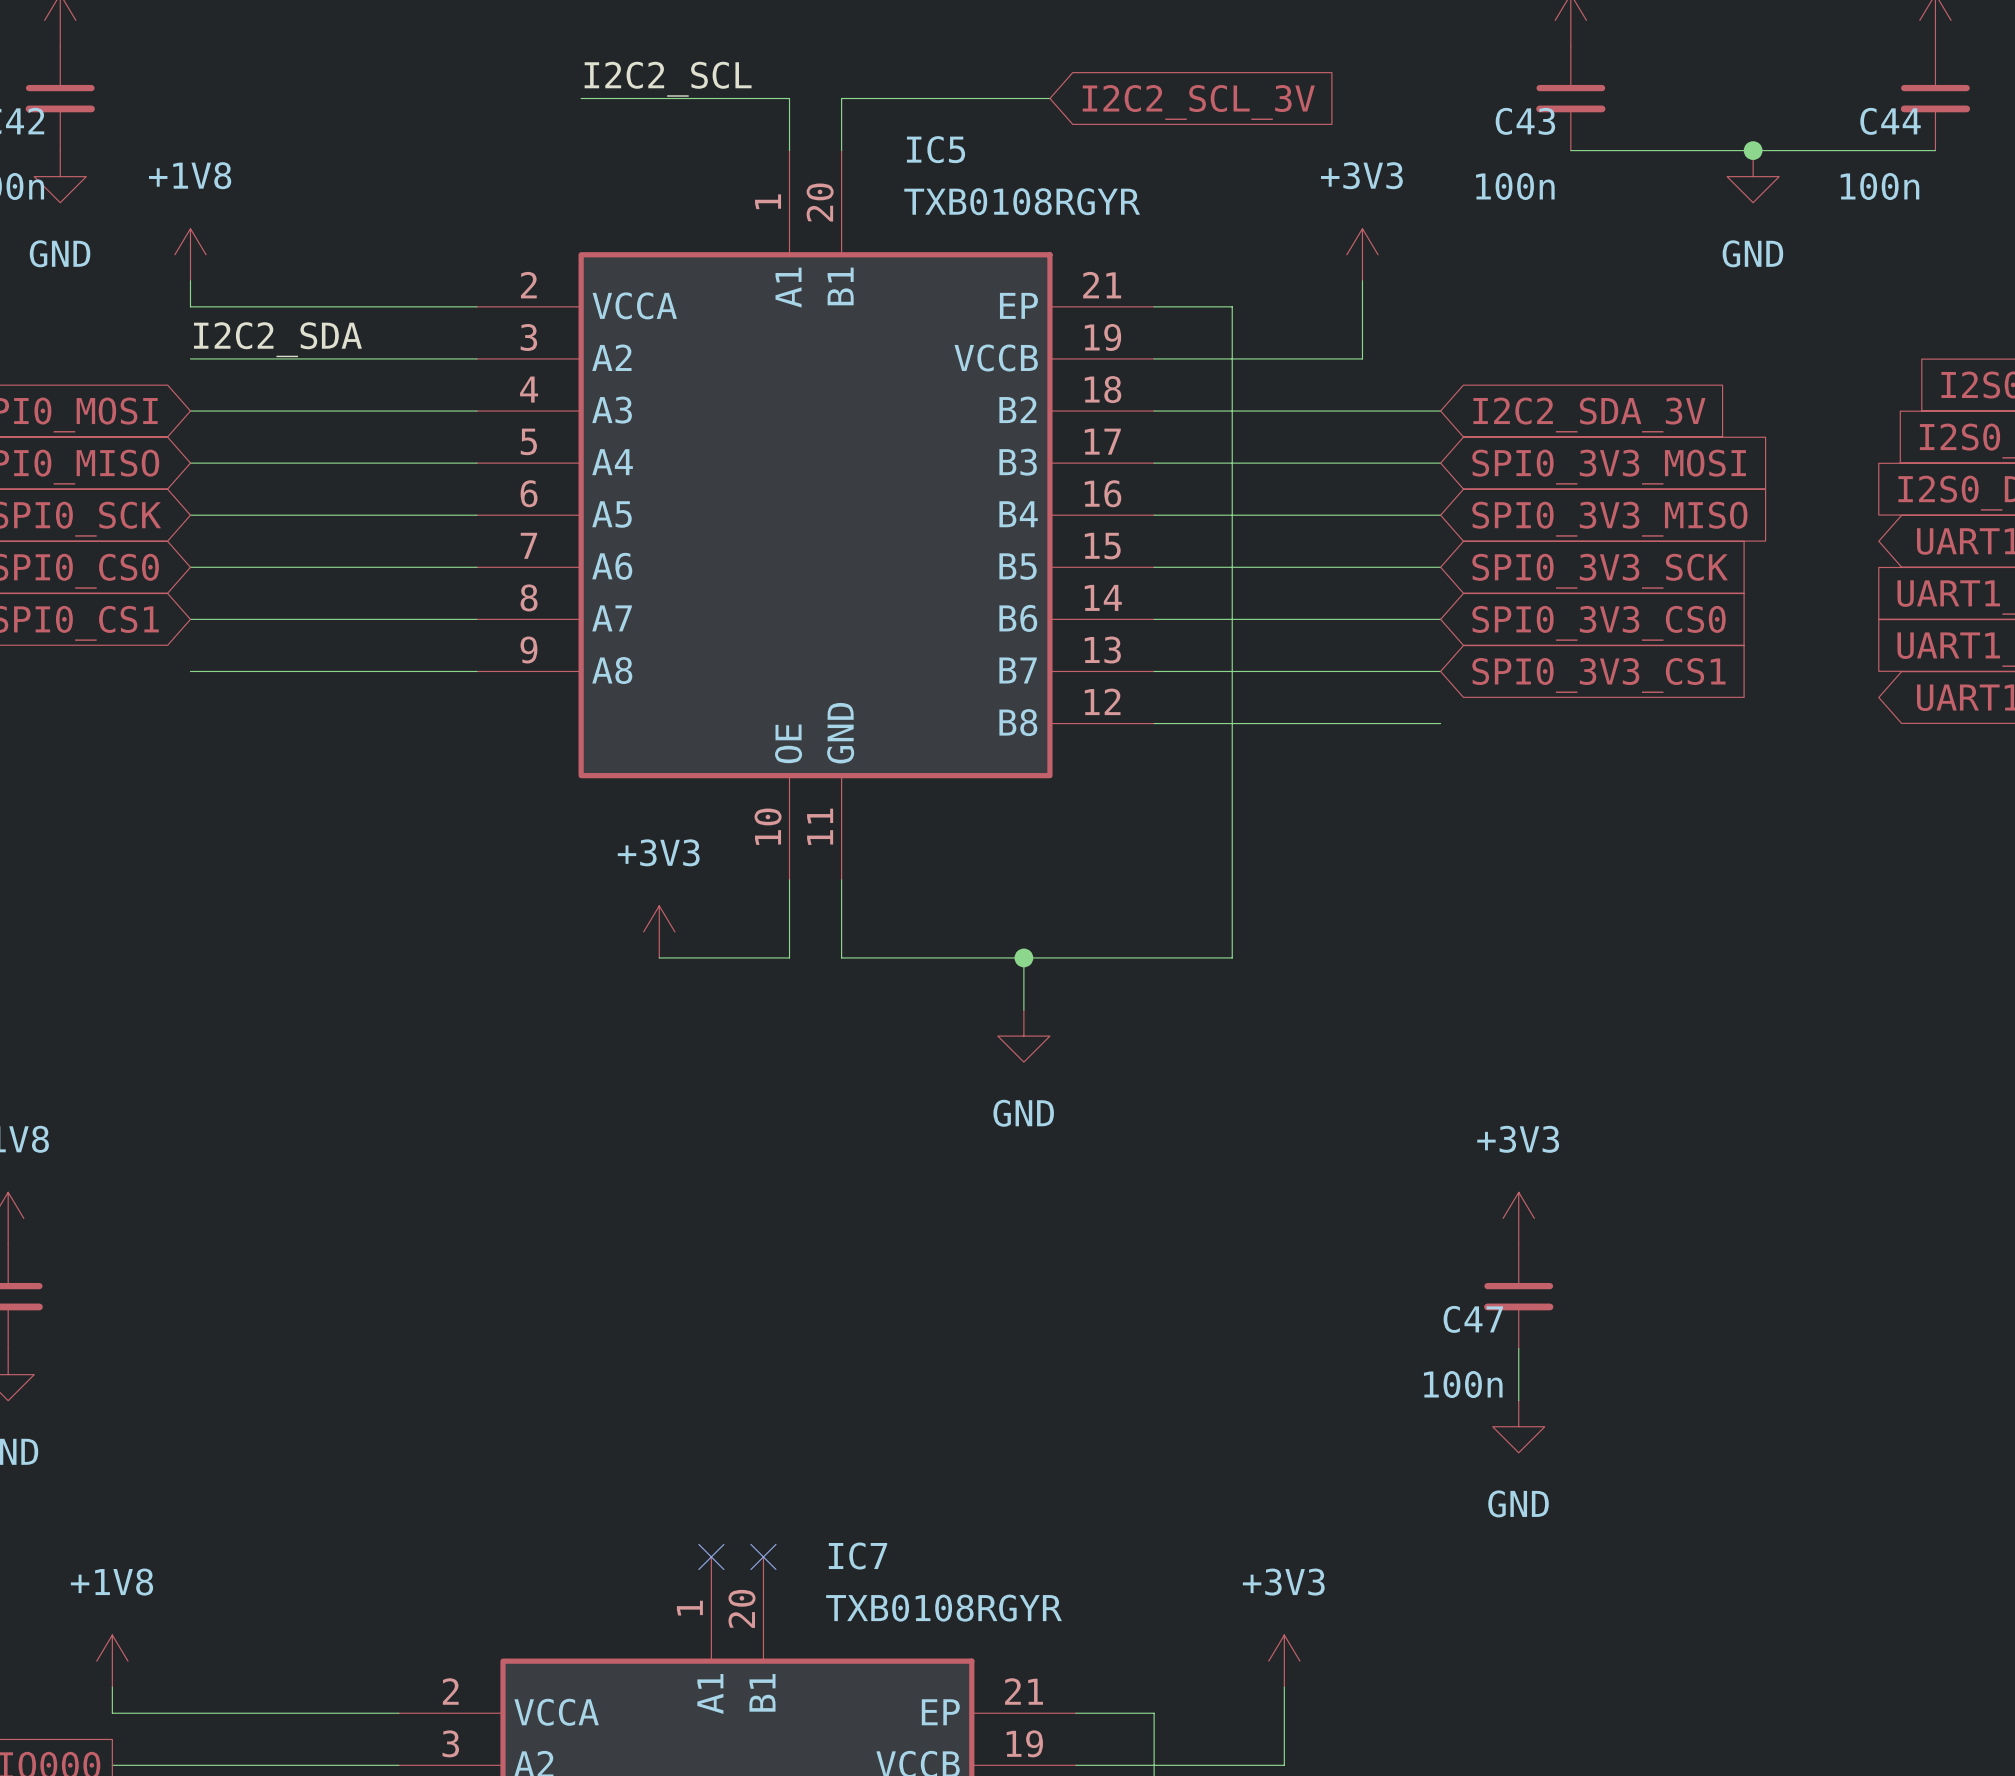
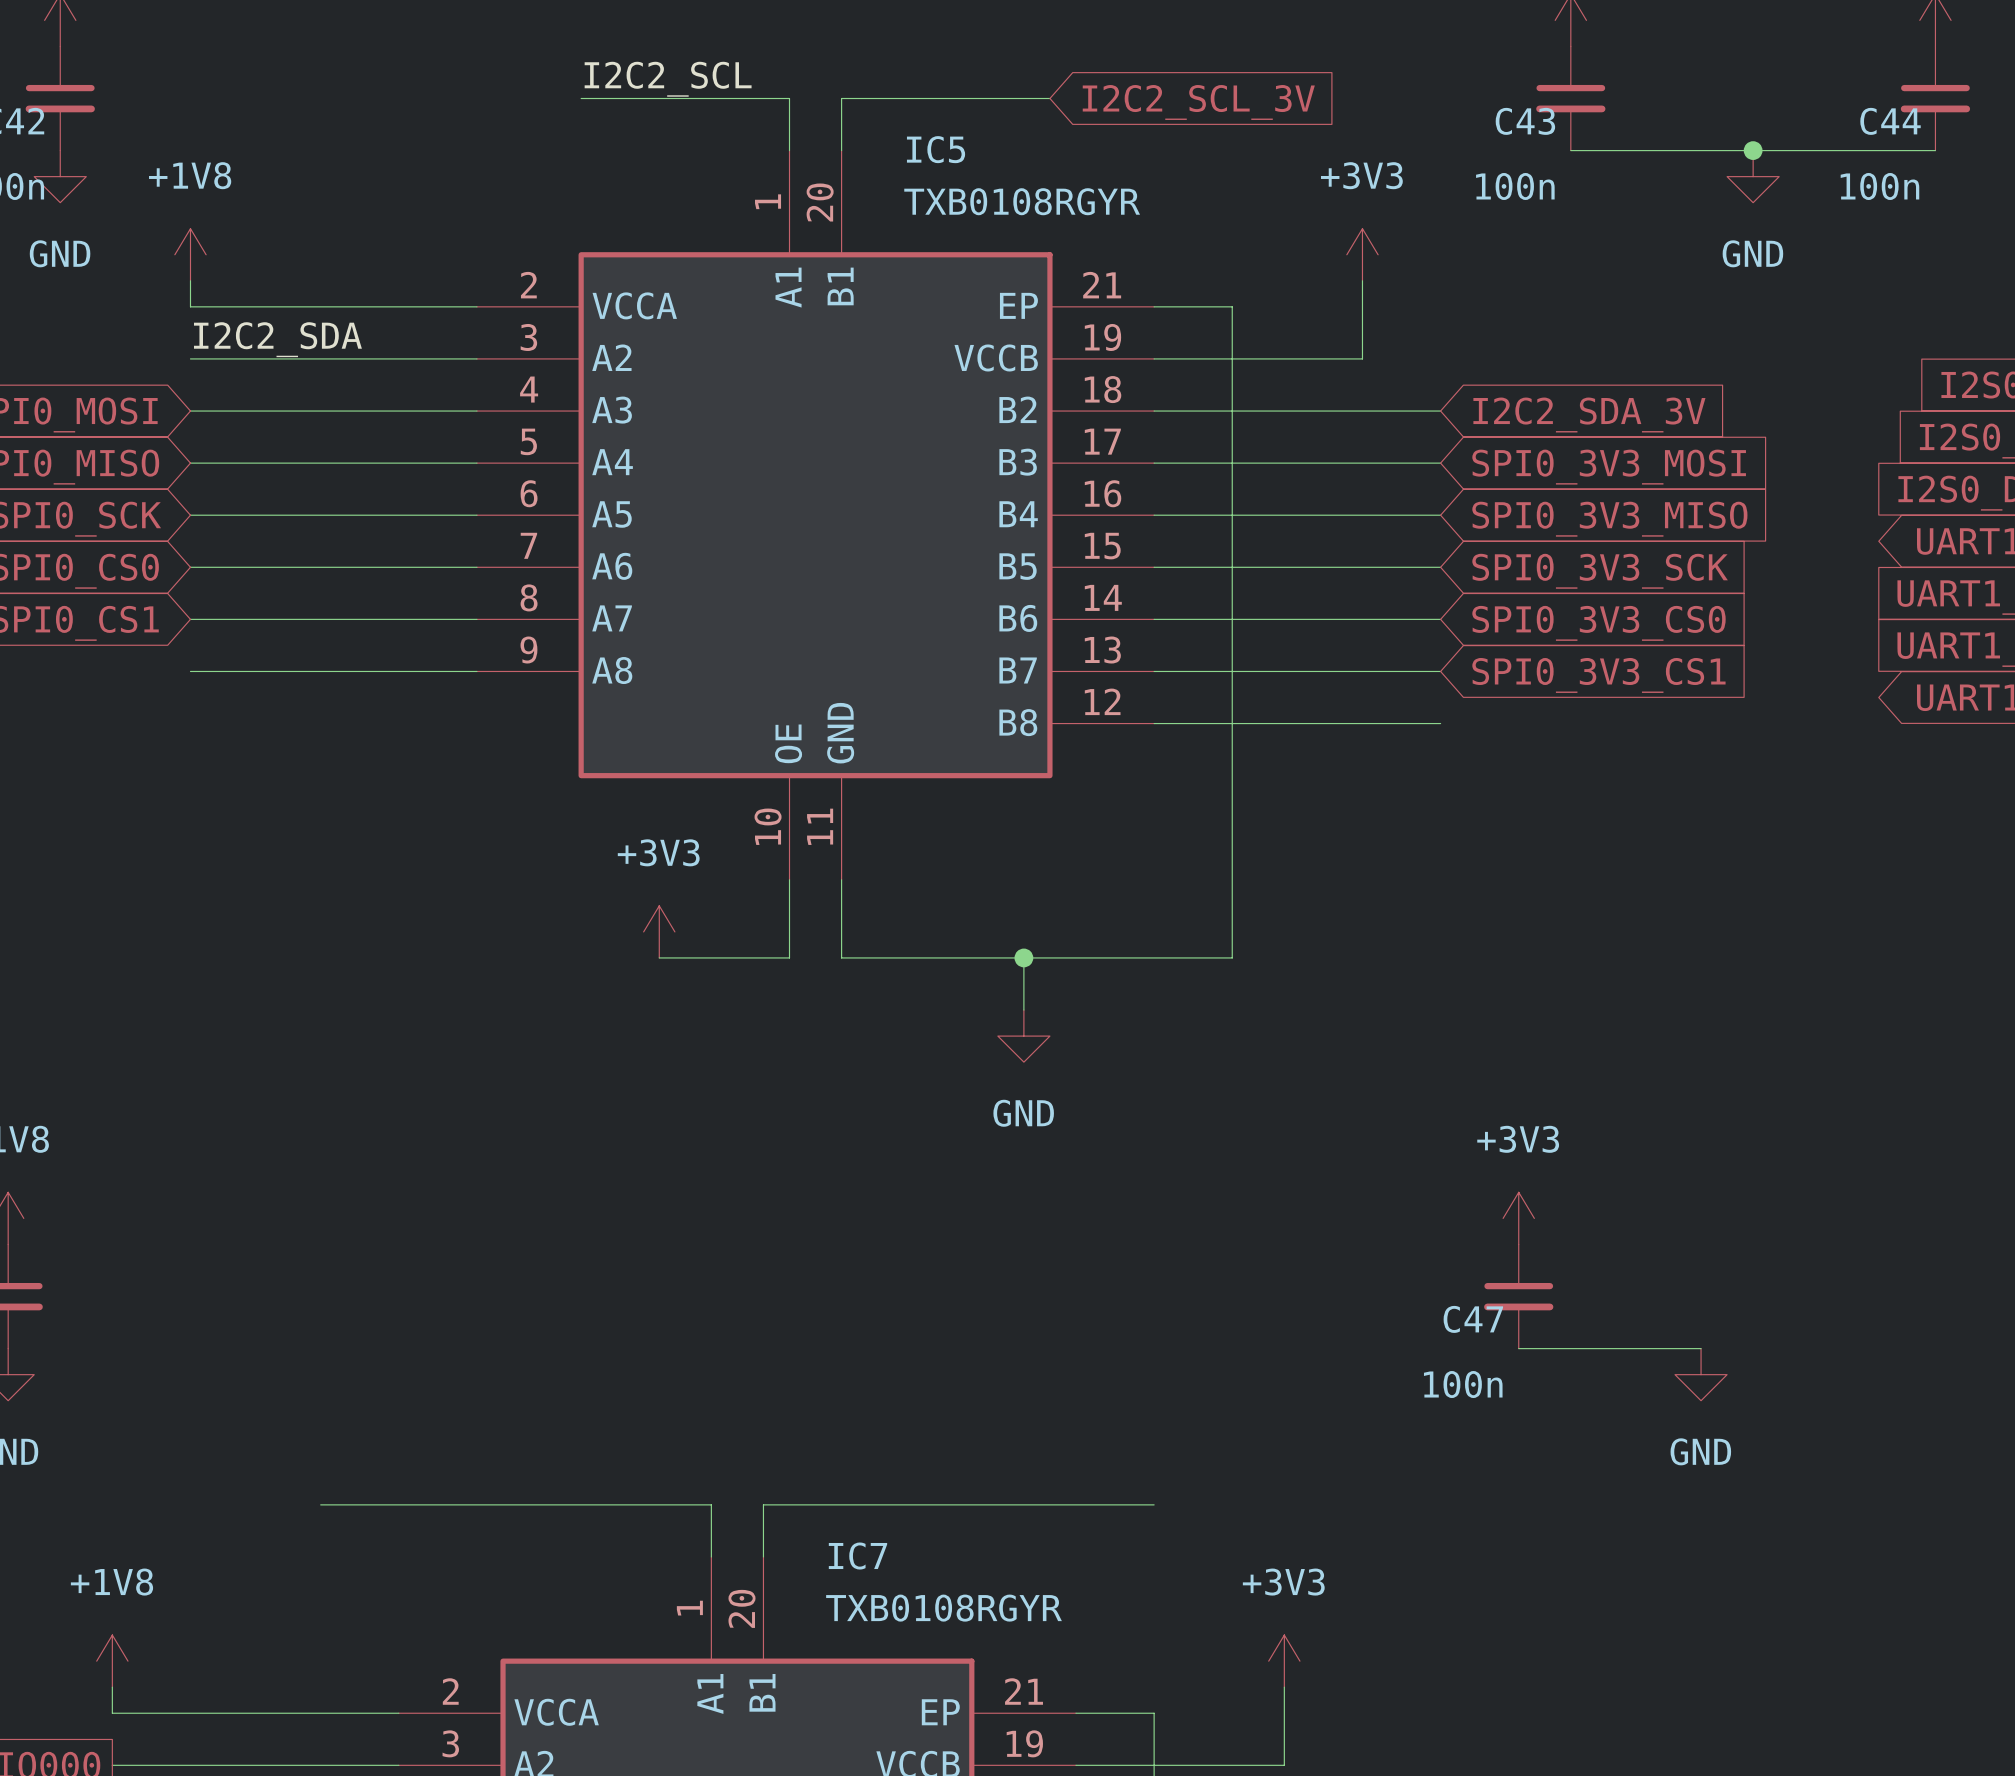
wire: (1518, 1348) (1518, 1400) -> (1518, 1348) (1701, 1348)
power symbol position: GND (1518, 1426) -> GND (1701, 1374)
wire: none -> (320, 1504) (711, 1504) (711, 1556)
wire: none -> (1154, 1504) (763, 1504) (763, 1556)
no-connect mark: (711, 1556) -> none
no-connect mark: (763, 1556) -> none

